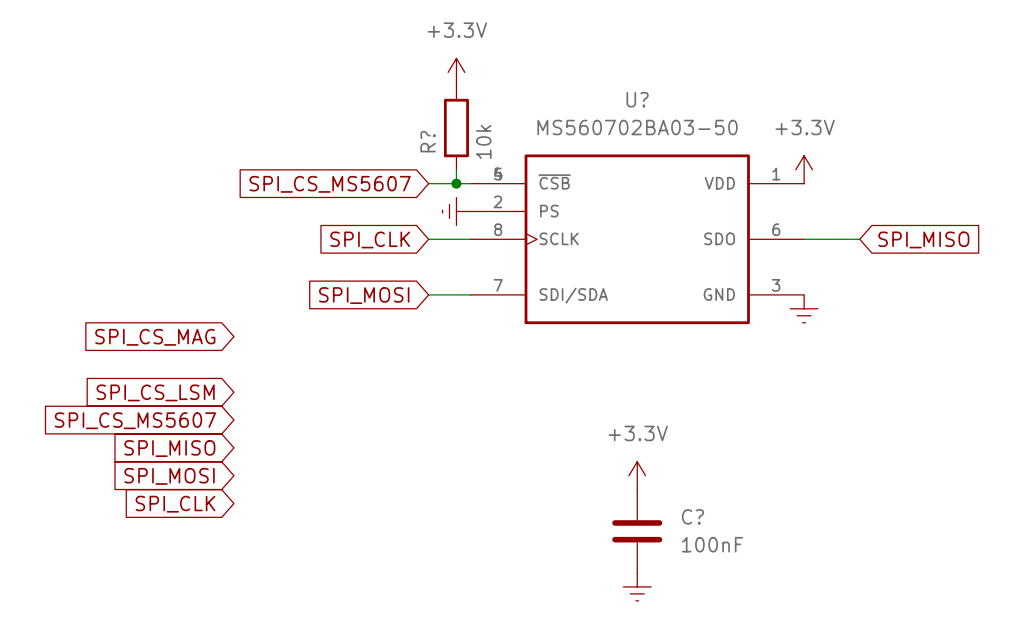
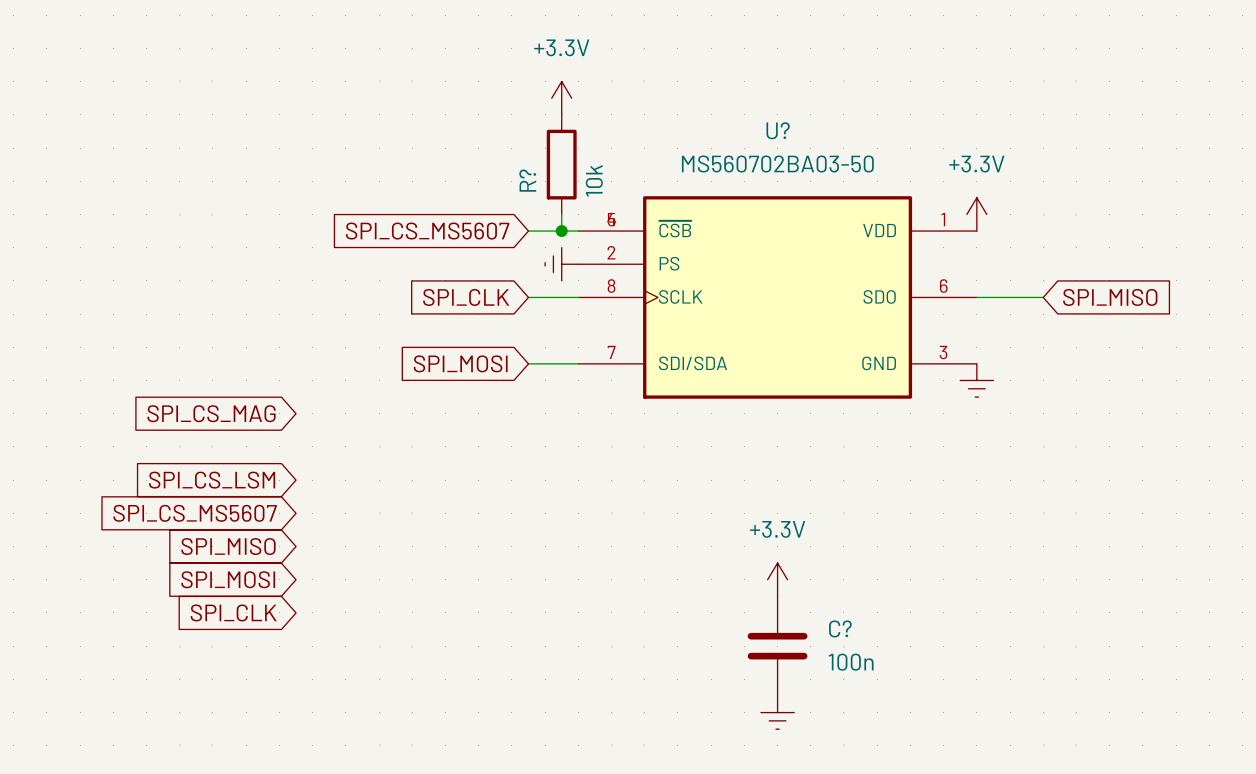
C? value: 100nF (712, 544) -> 100n (851, 662)

